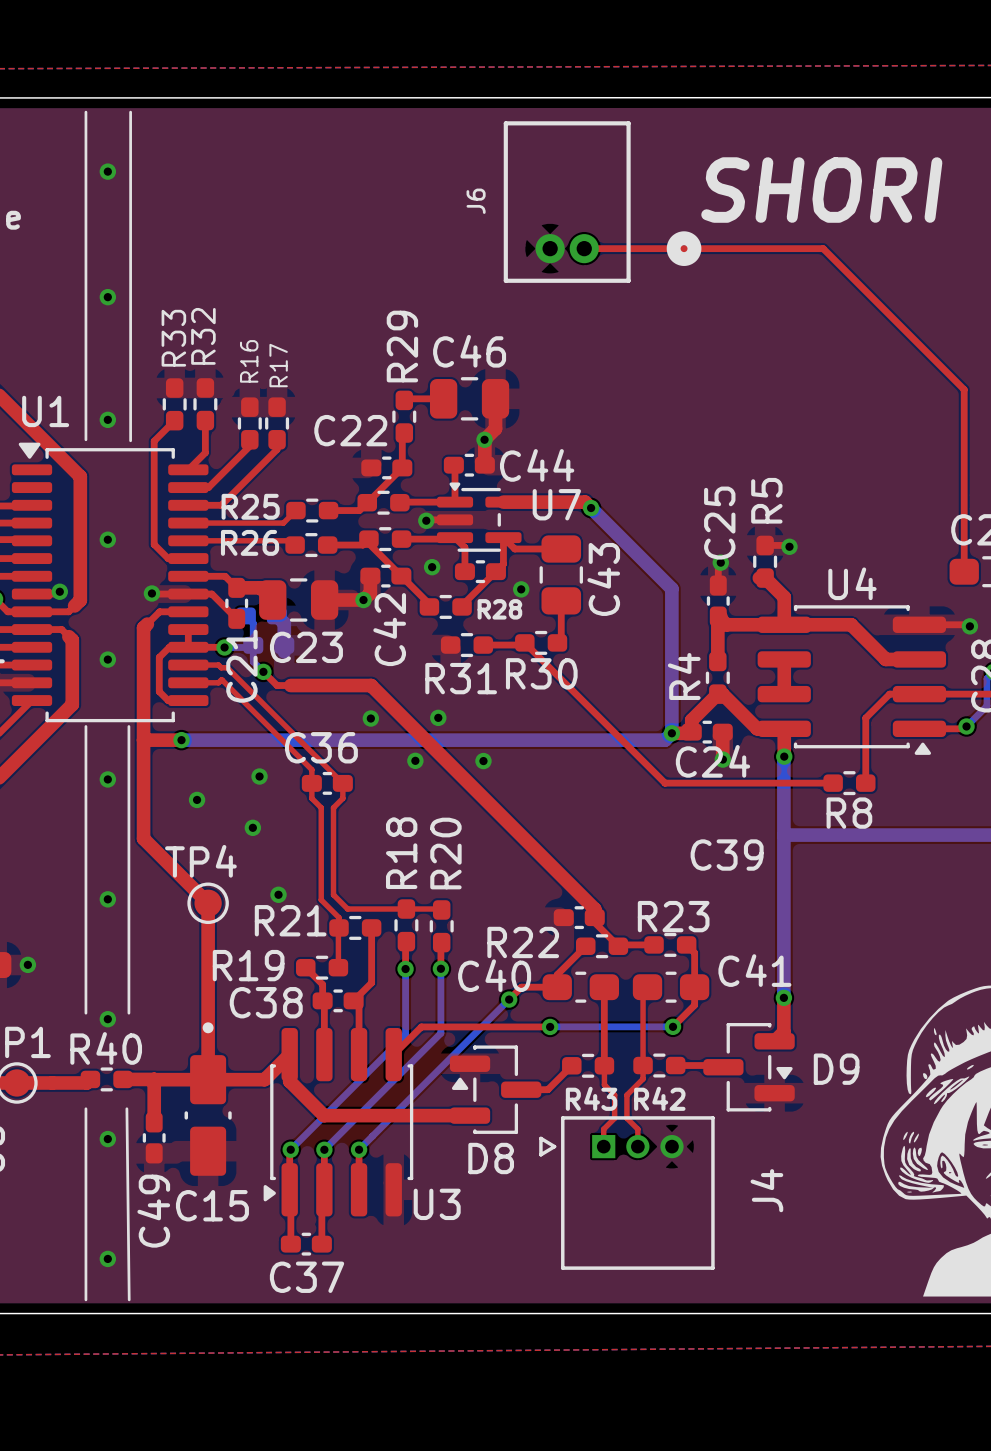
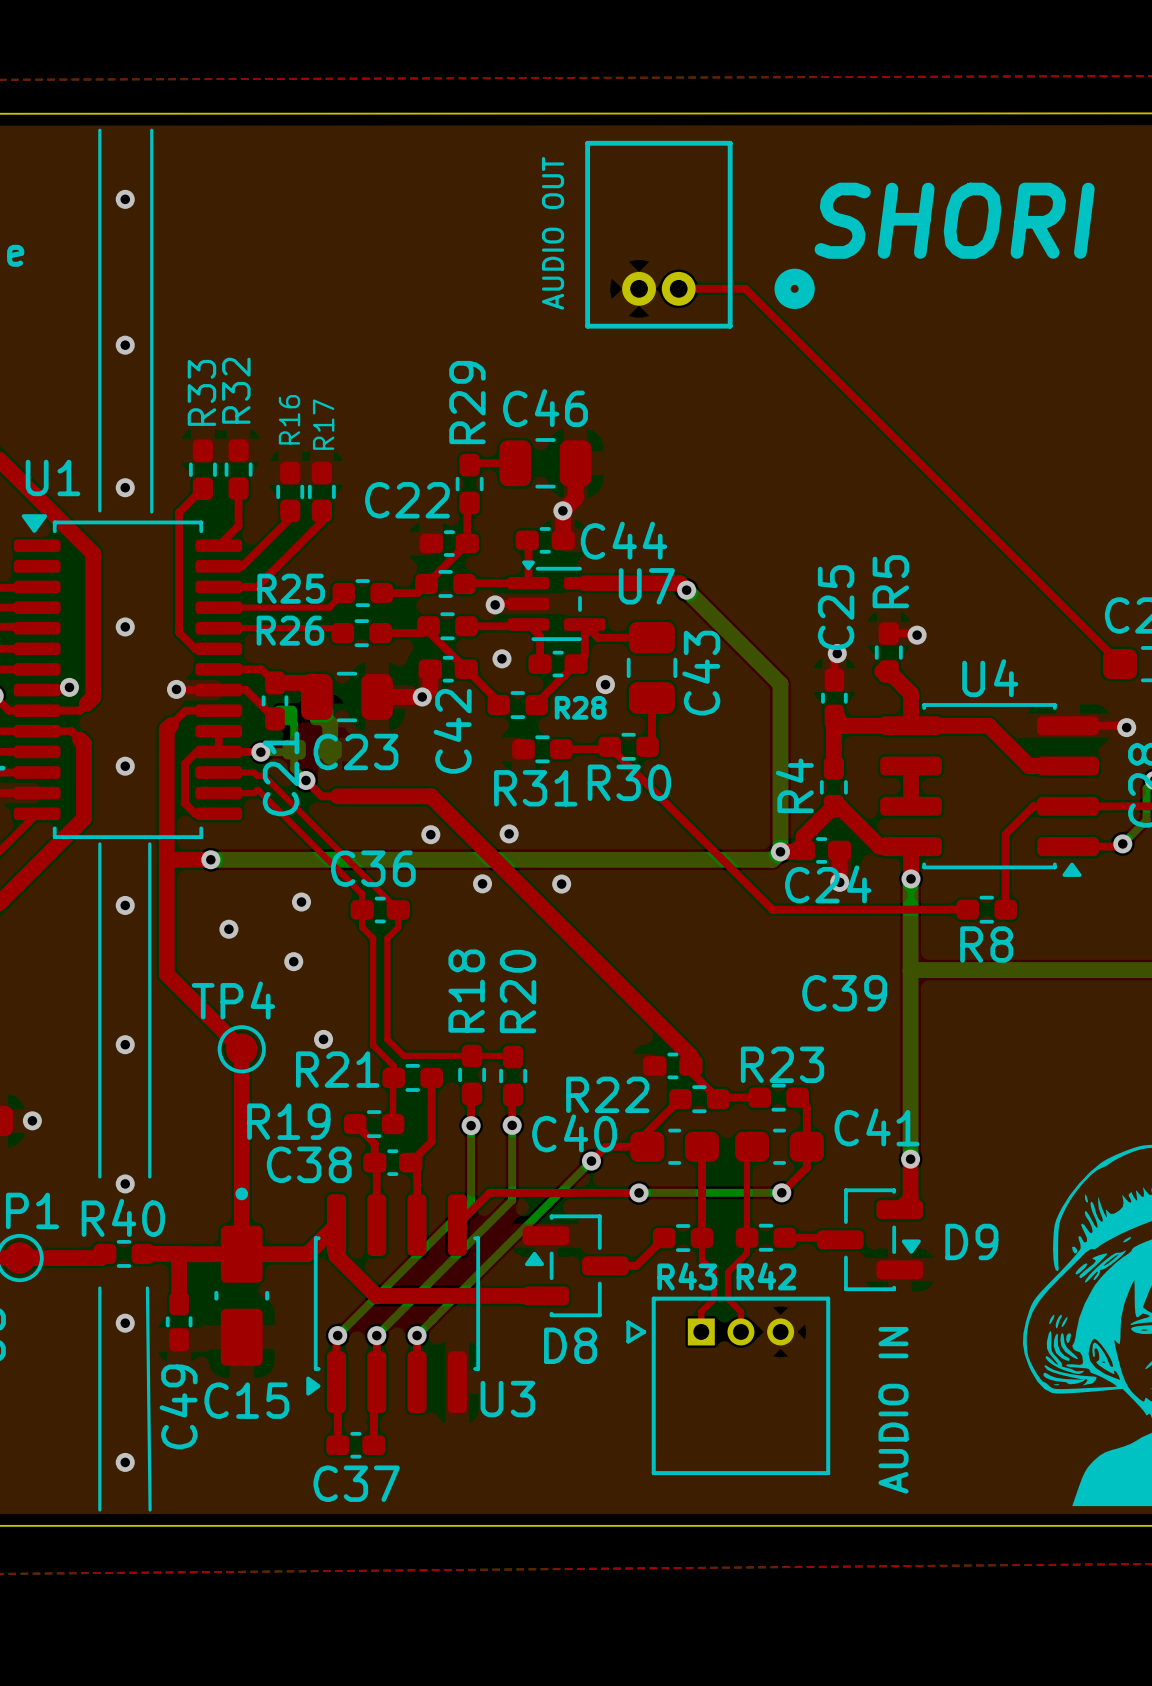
J6 name: J6 (476, 201) -> AUDIO OUT (553, 233)
top track: (641, 248) (823, 248) (964, 389) (964, 571) -> (745, 288) (1120, 663)
J4 name: J4 (766, 1190) -> AUDIO IN (893, 1410)

